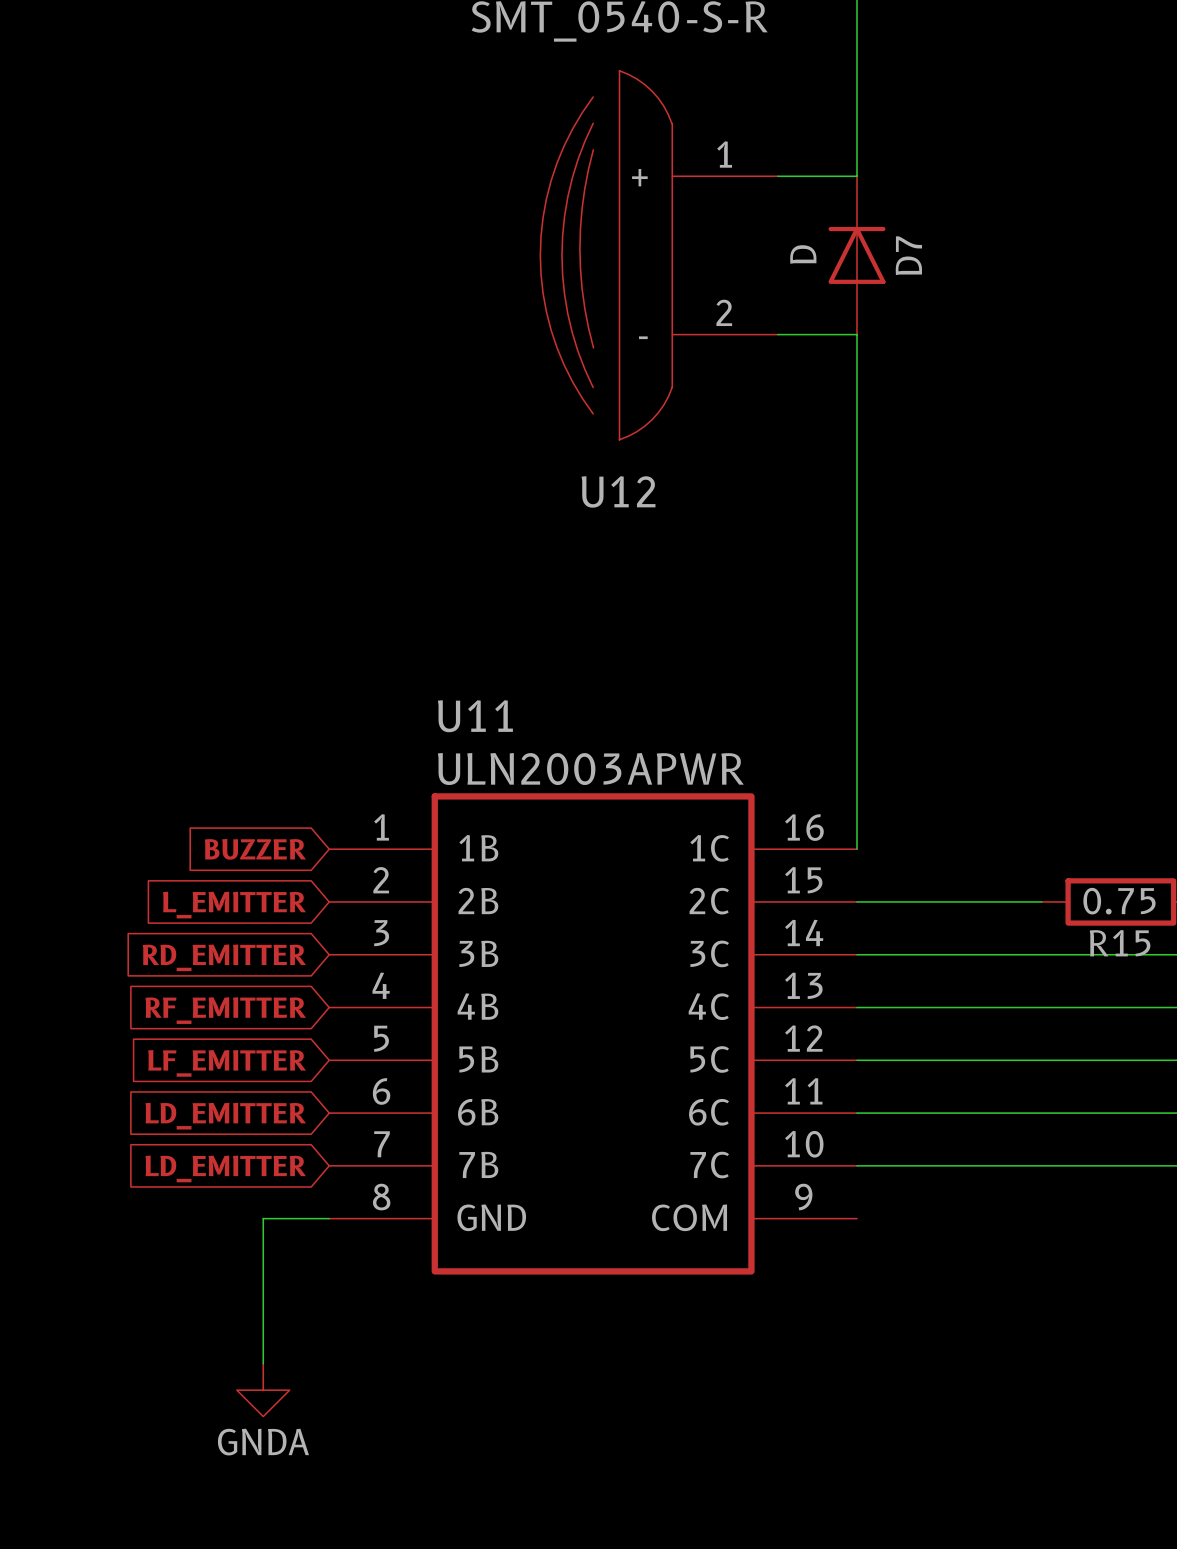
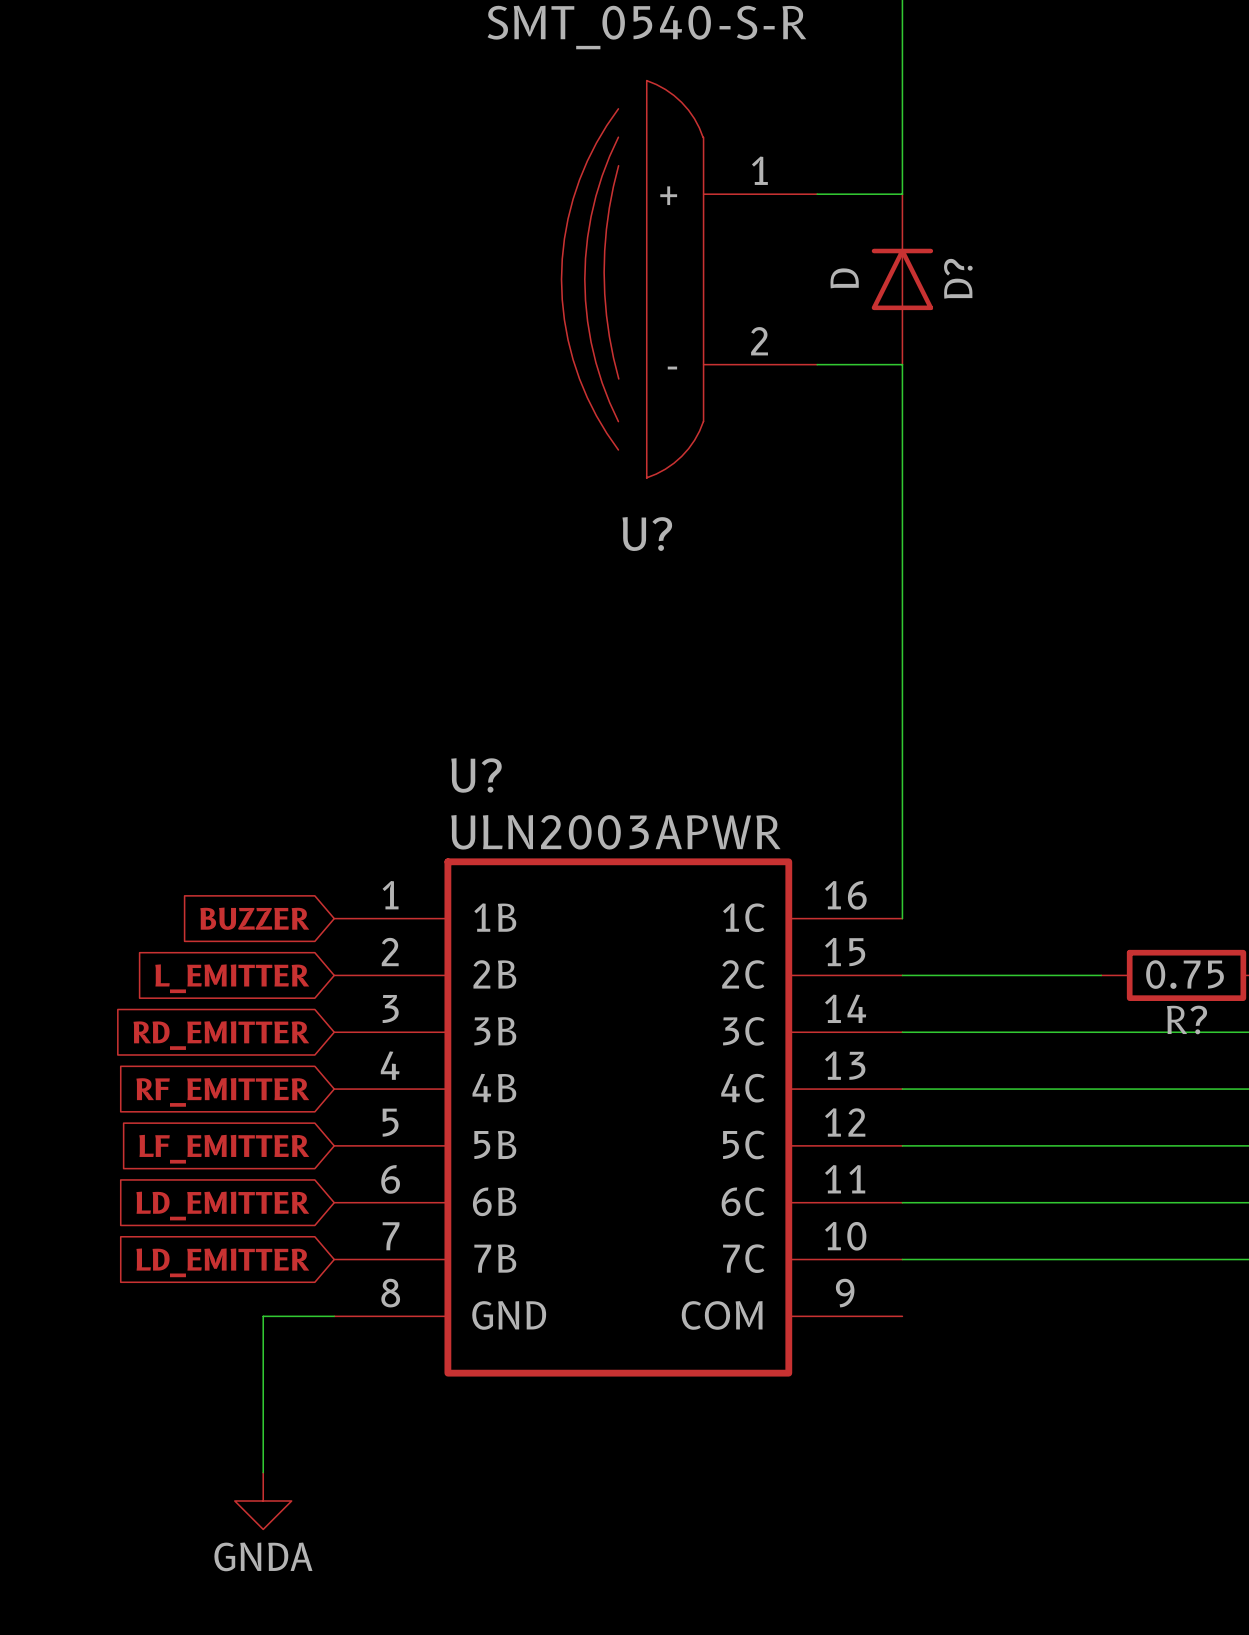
D7 name: D7 (908, 255) -> D? (958, 278)
U12 name: U12 (618, 491) -> U? (647, 534)
U11 name: U11 (475, 716) -> U? (476, 775)
R15 name: R15 (1120, 943) -> R? (1187, 1019)

